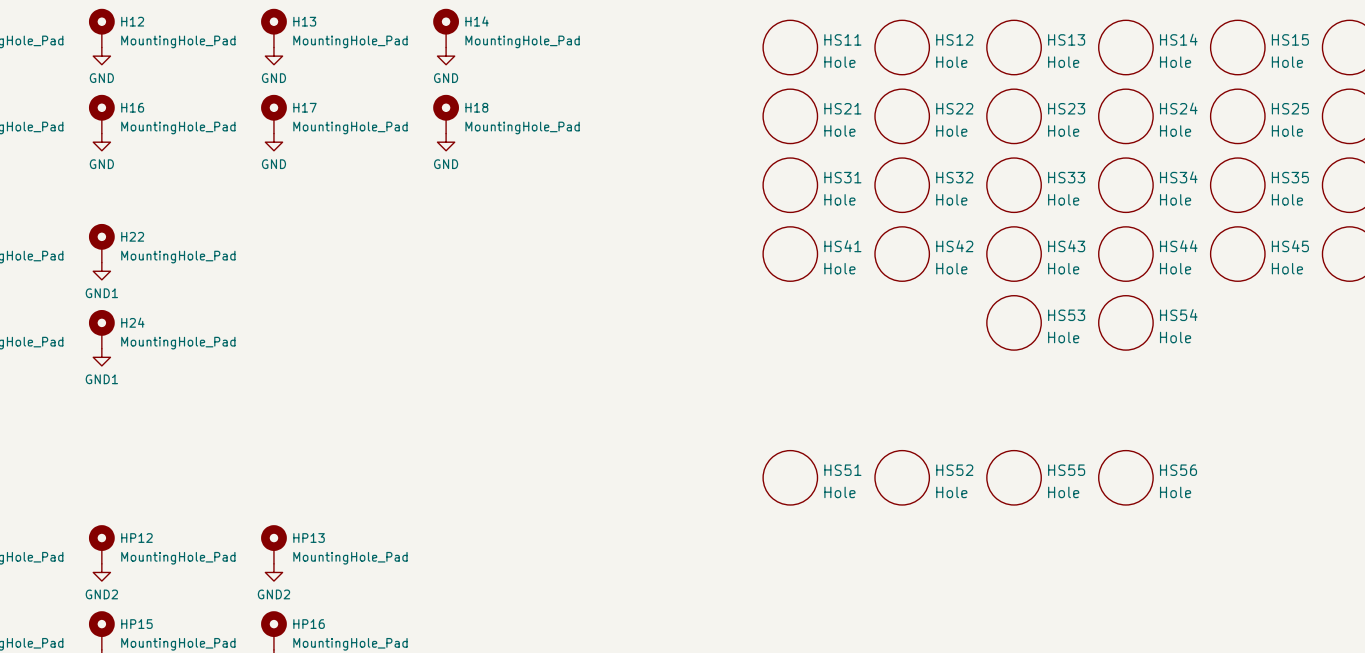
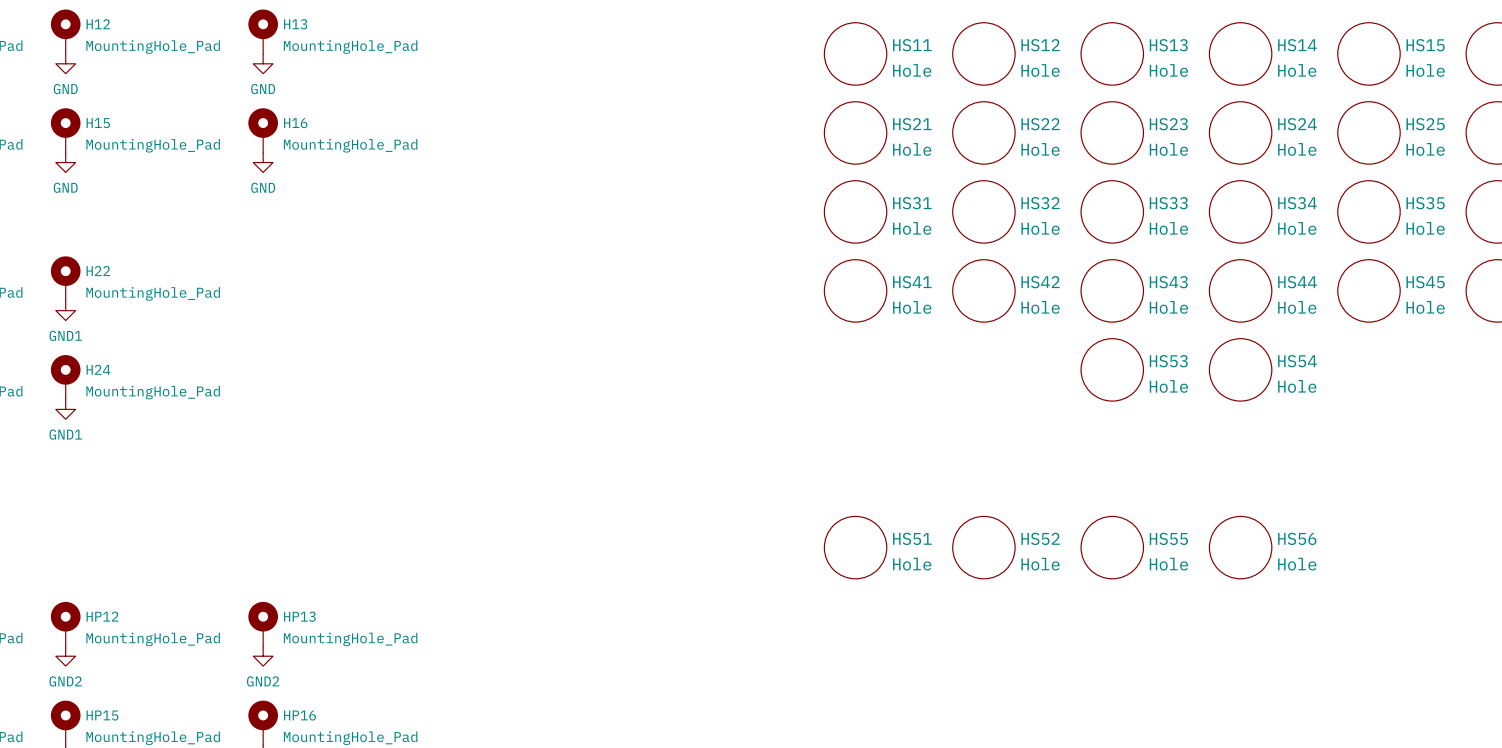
H14: MountingHole_Pad (446, 28) -> none
power symbol: GND (446, 56) -> none
H16 name: H16 (132, 107) -> H15 (98, 123)
H17 name: H17 (304, 107) -> H16 (295, 123)
H18: MountingHole_Pad (446, 114) -> none
power symbol: GND (446, 142) -> none

